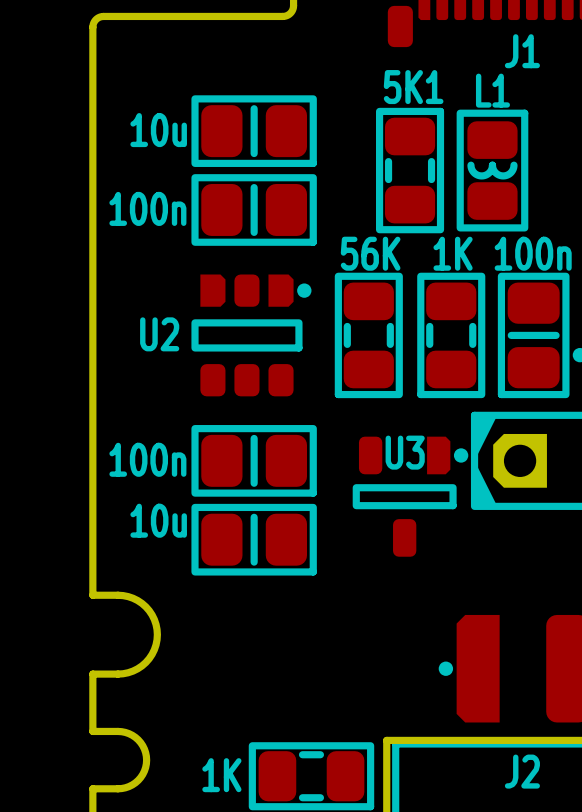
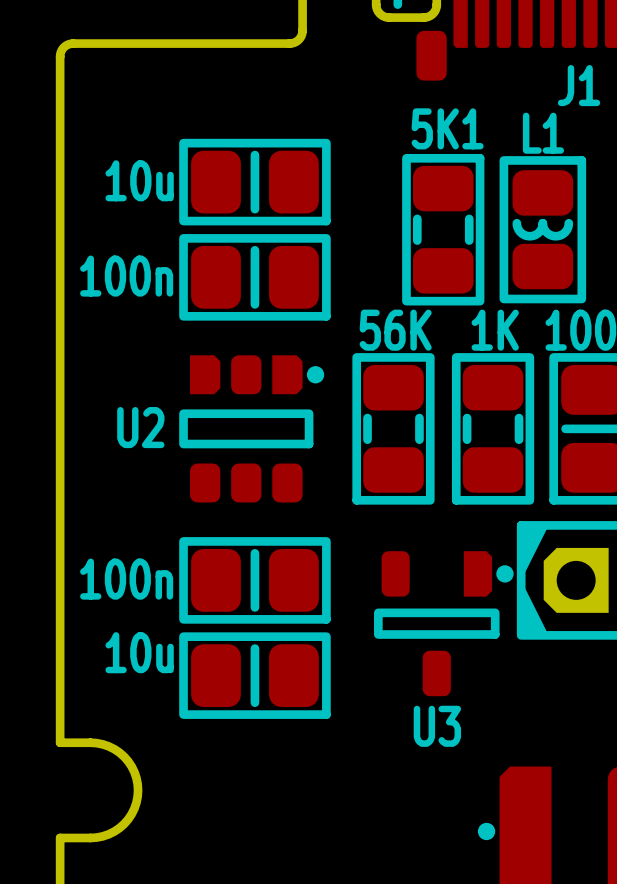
U3 name position: U3 (405, 452) -> U3 (437, 726)

